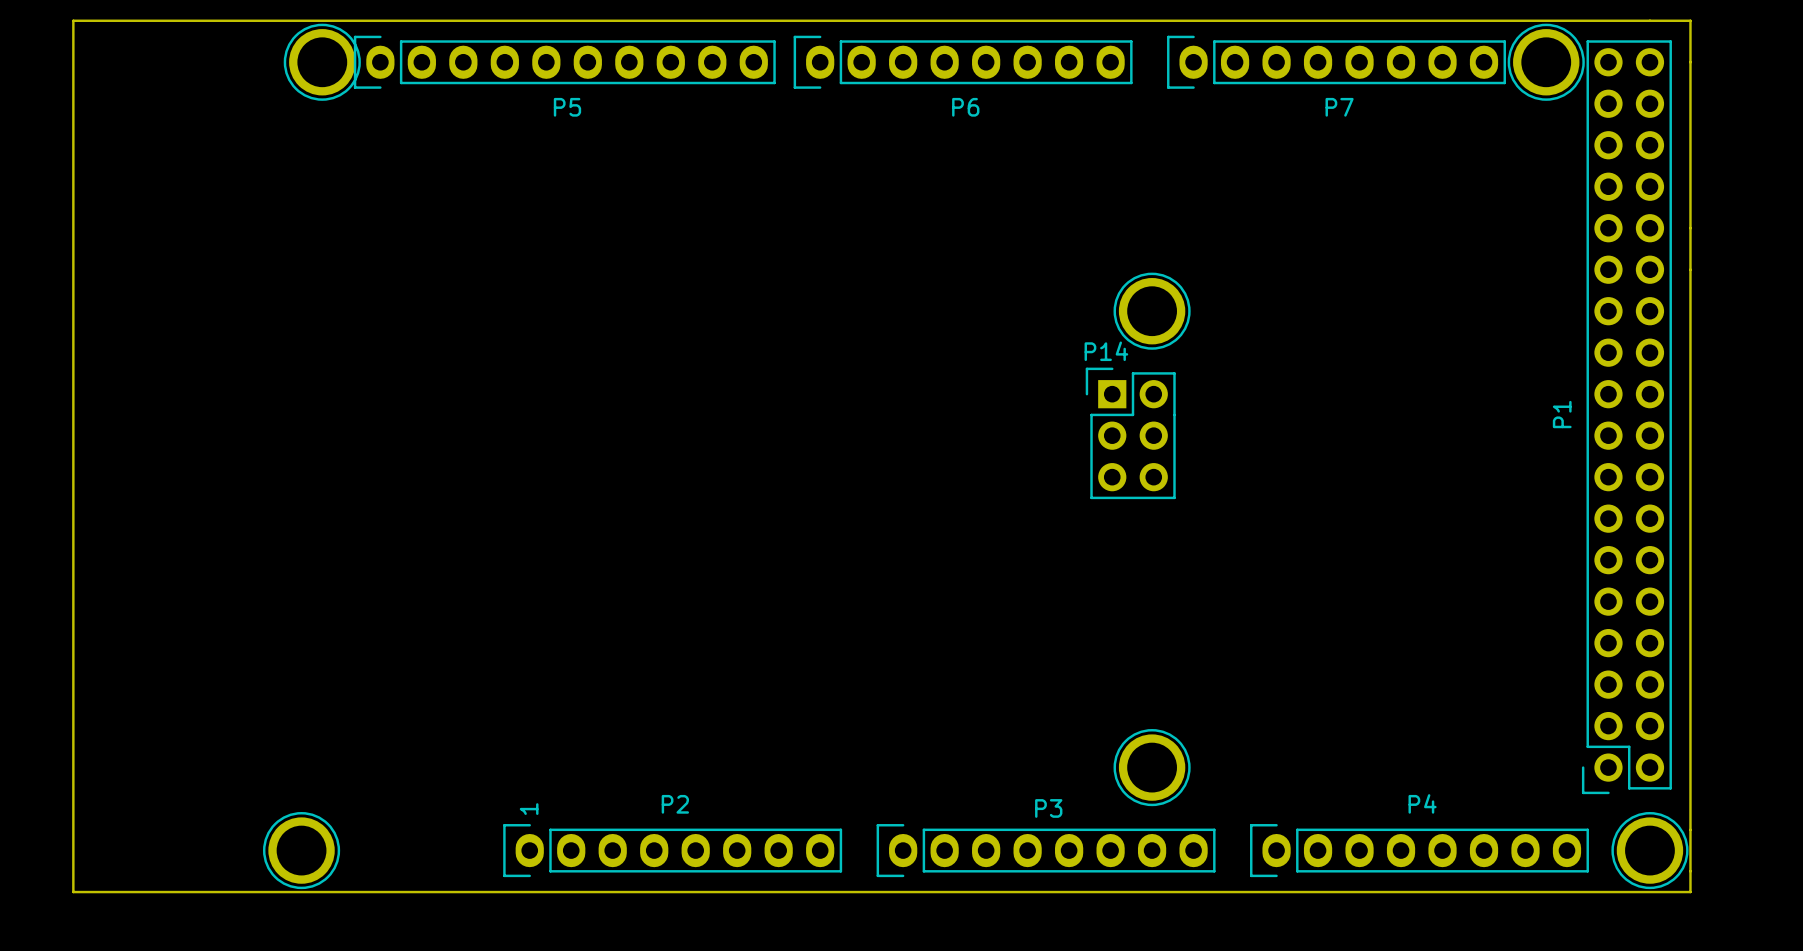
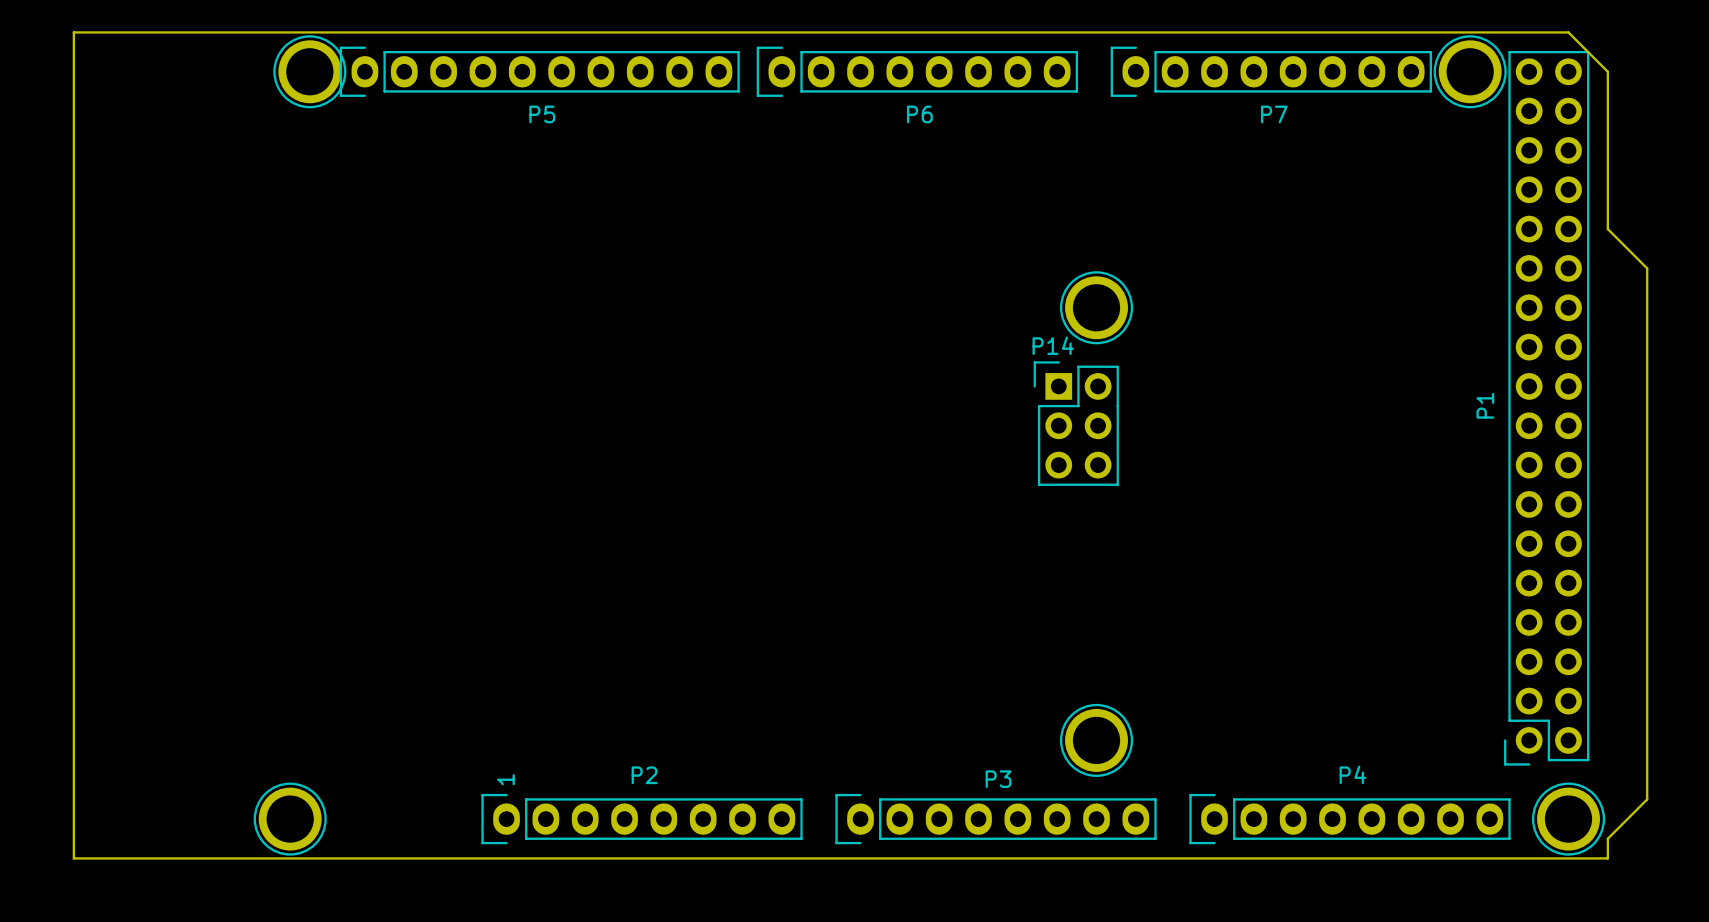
board edge: (1649, 20) (1690, 20) (1690, 892) -> (1568, 32) (1607, 71) (1607, 229) (1647, 268) (1647, 799) (1607, 838) (1606, 858)

